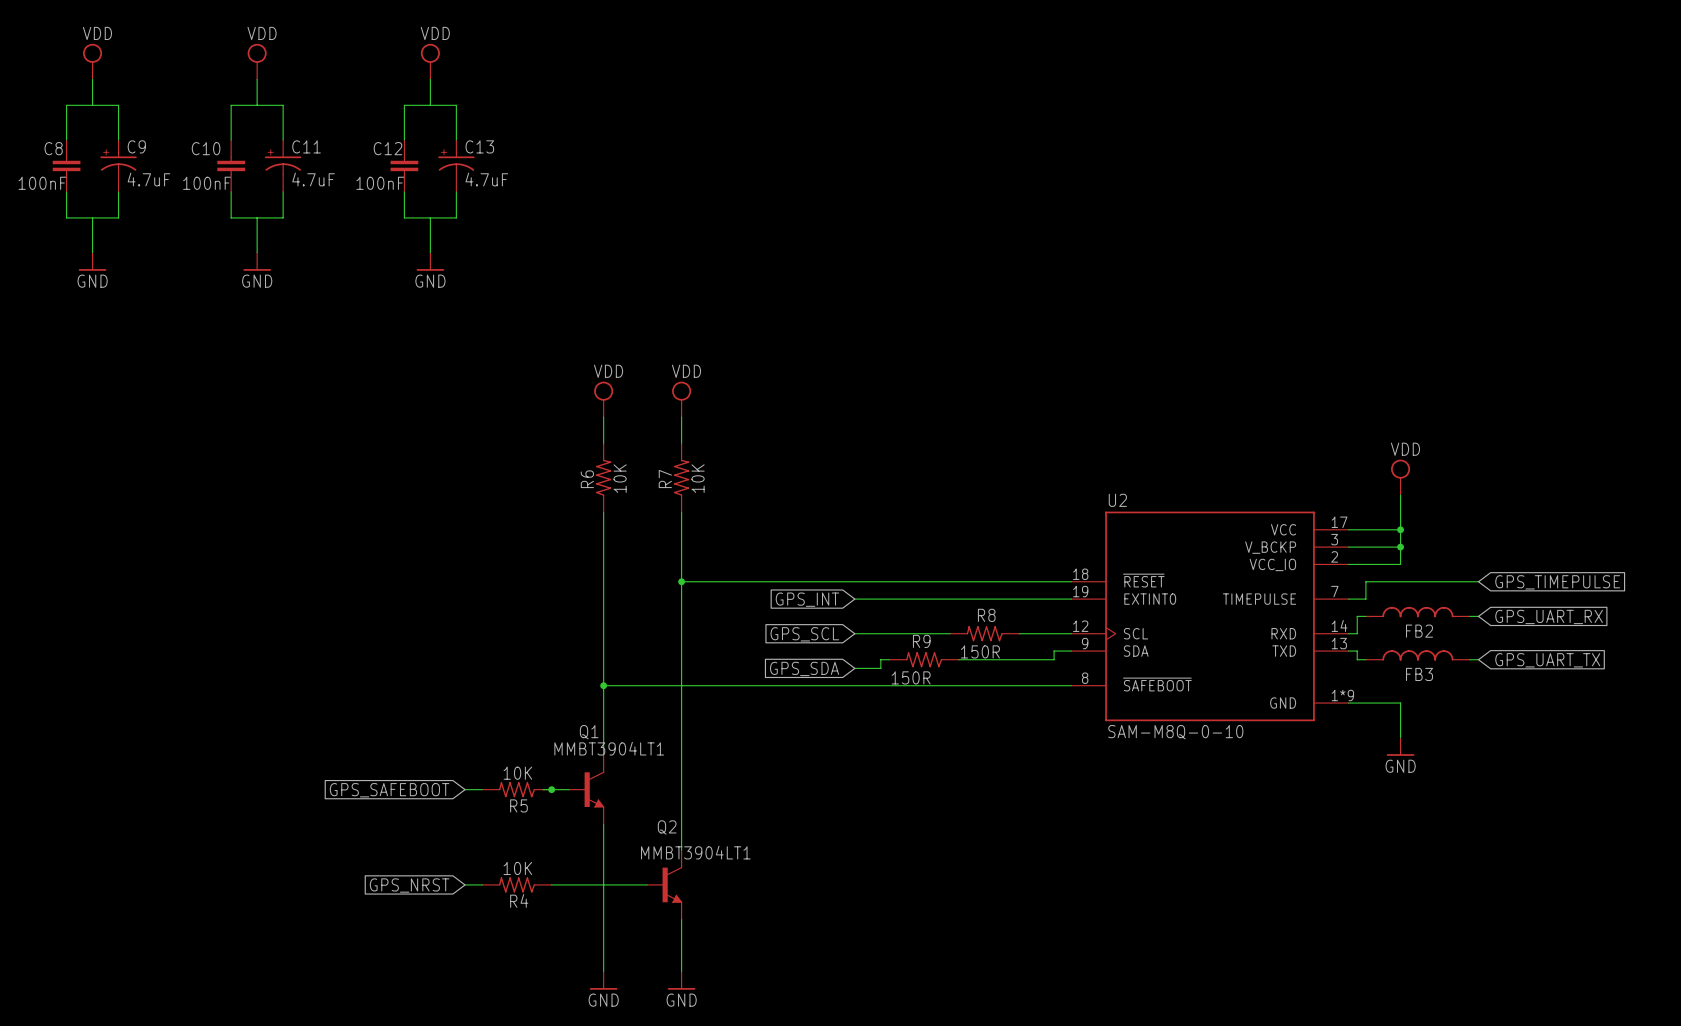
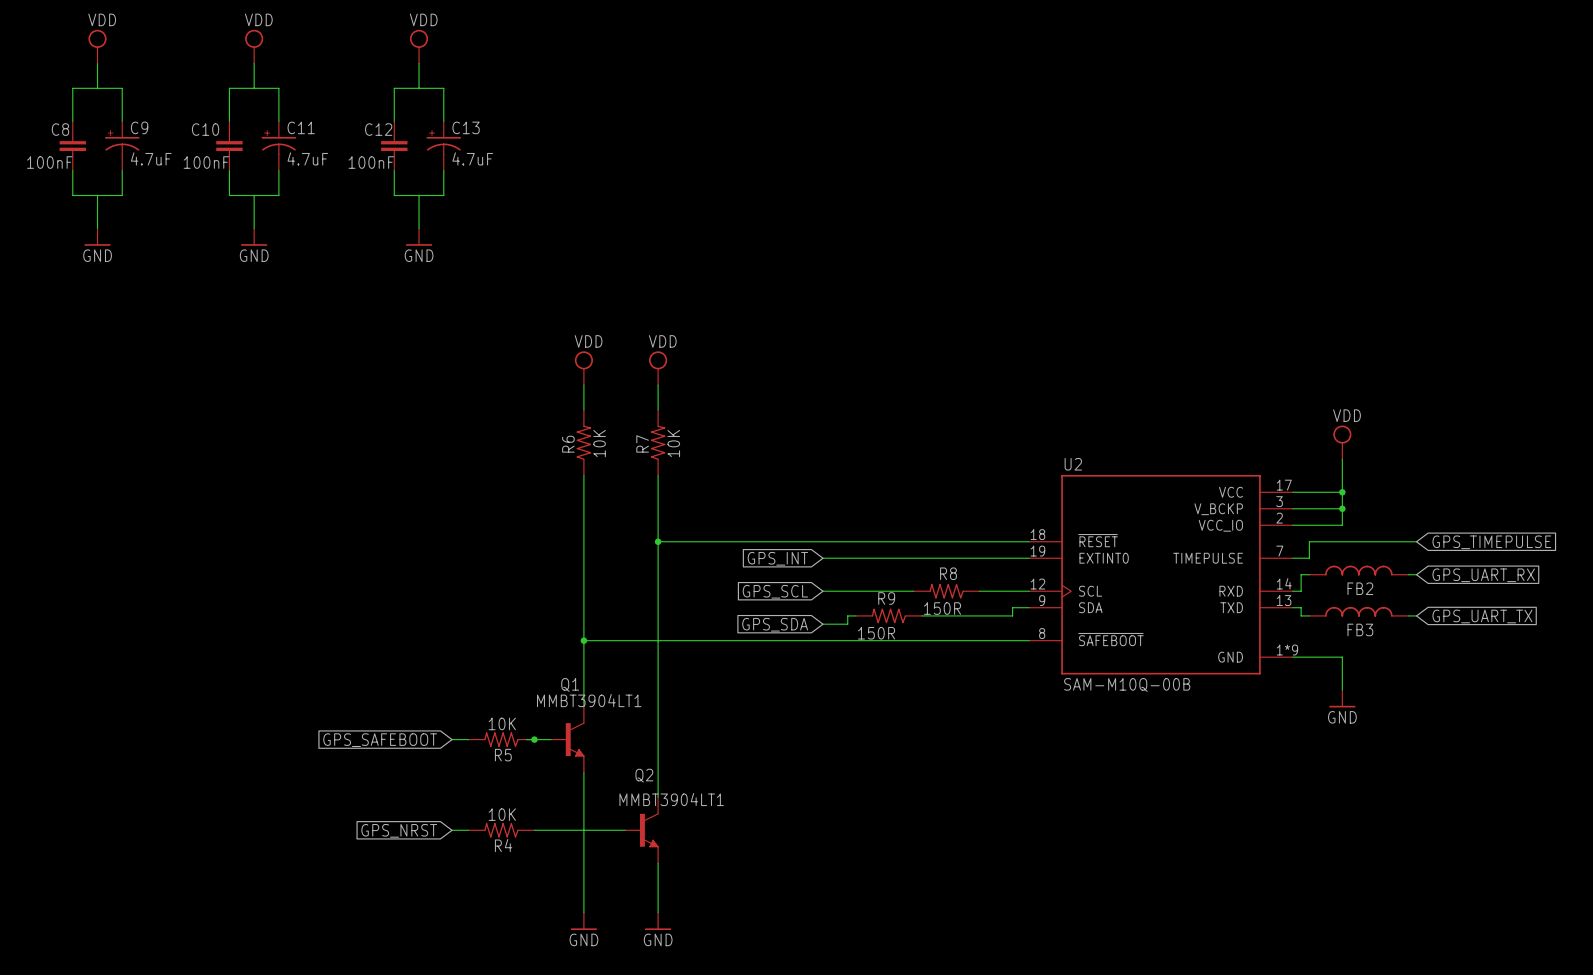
U2 text: none -> SAM-M10Q-00B (1127, 684)
U2 value: SAM-M8Q-0-10 (1175, 732) -> none

